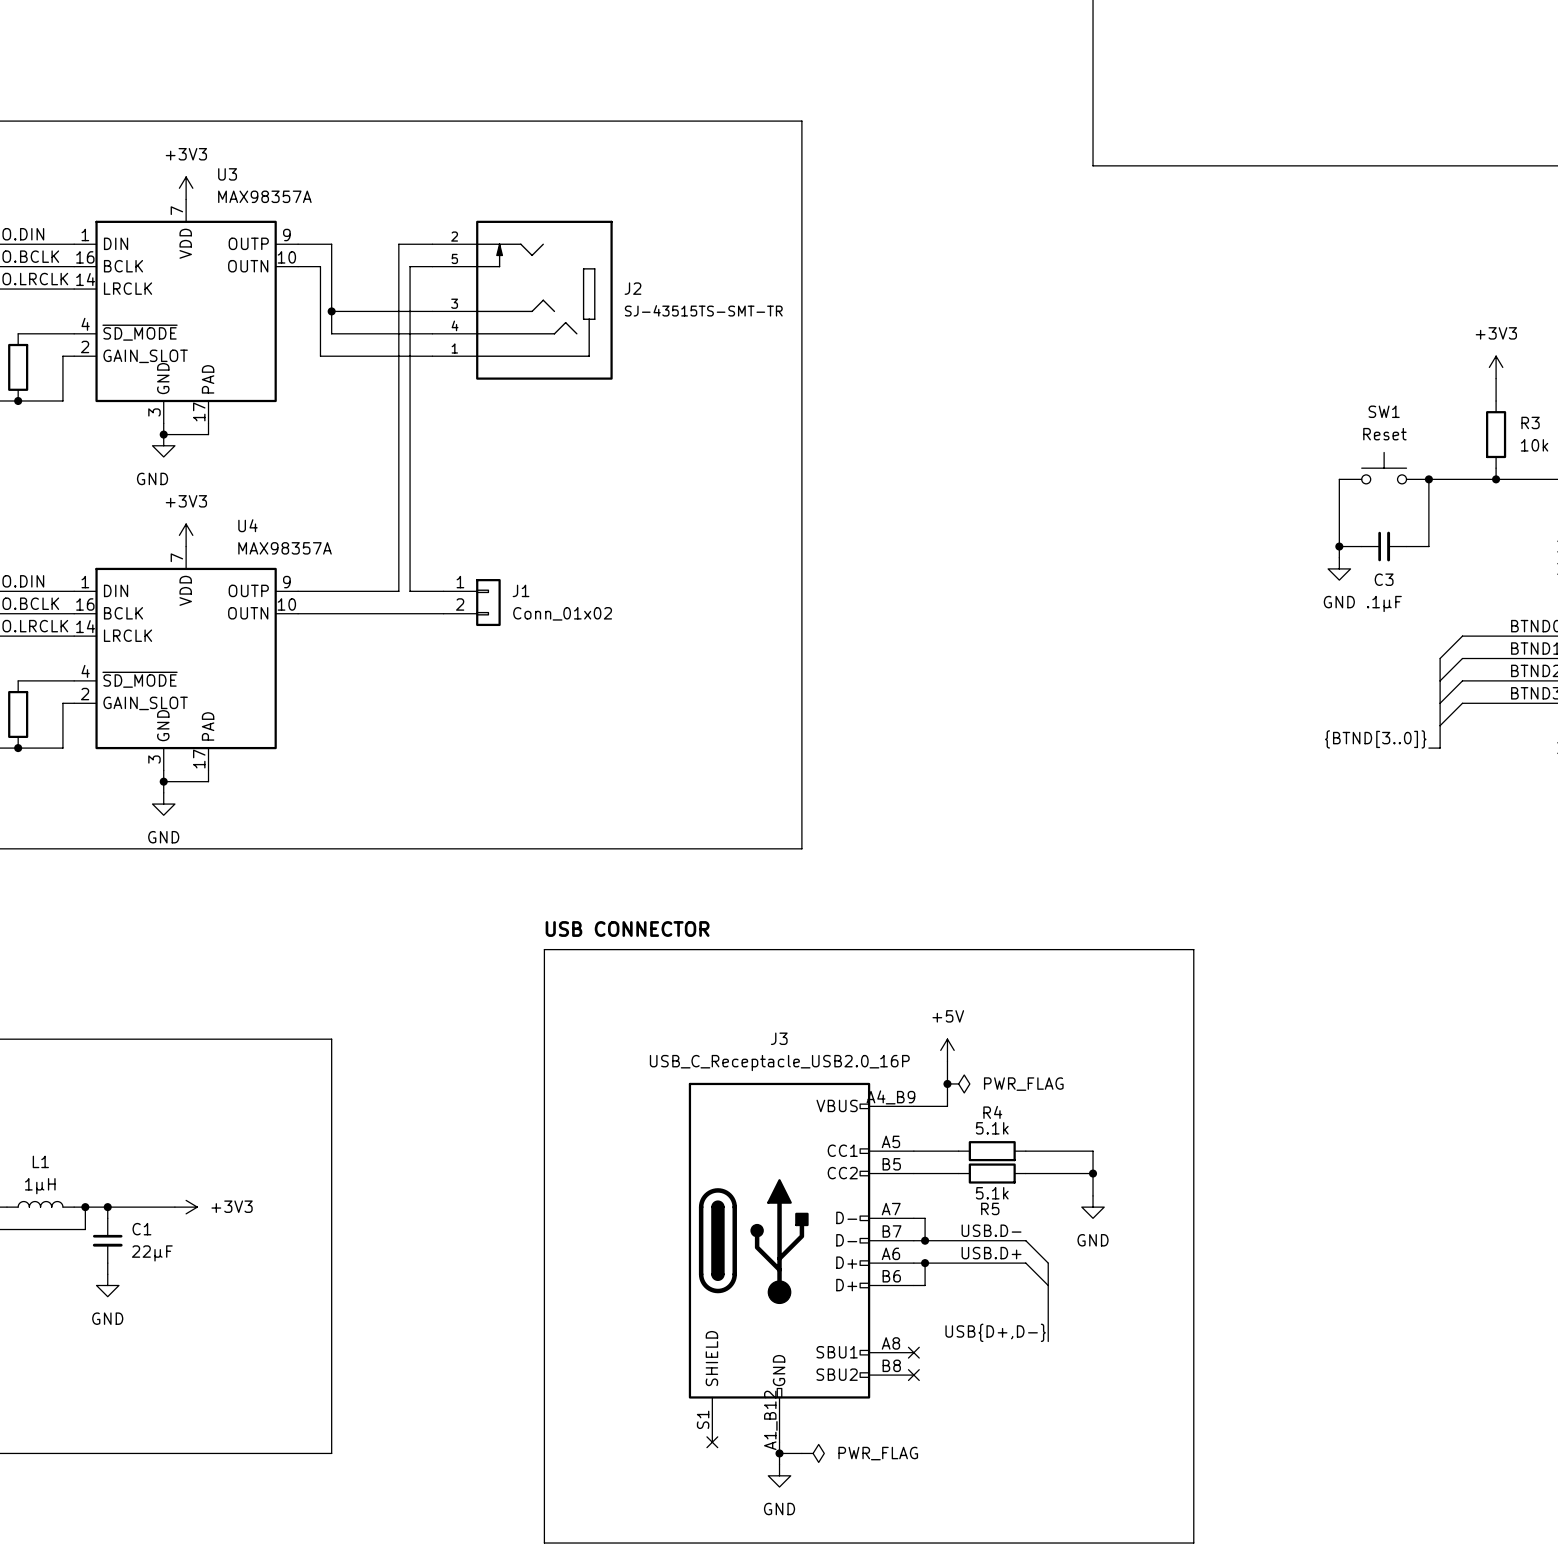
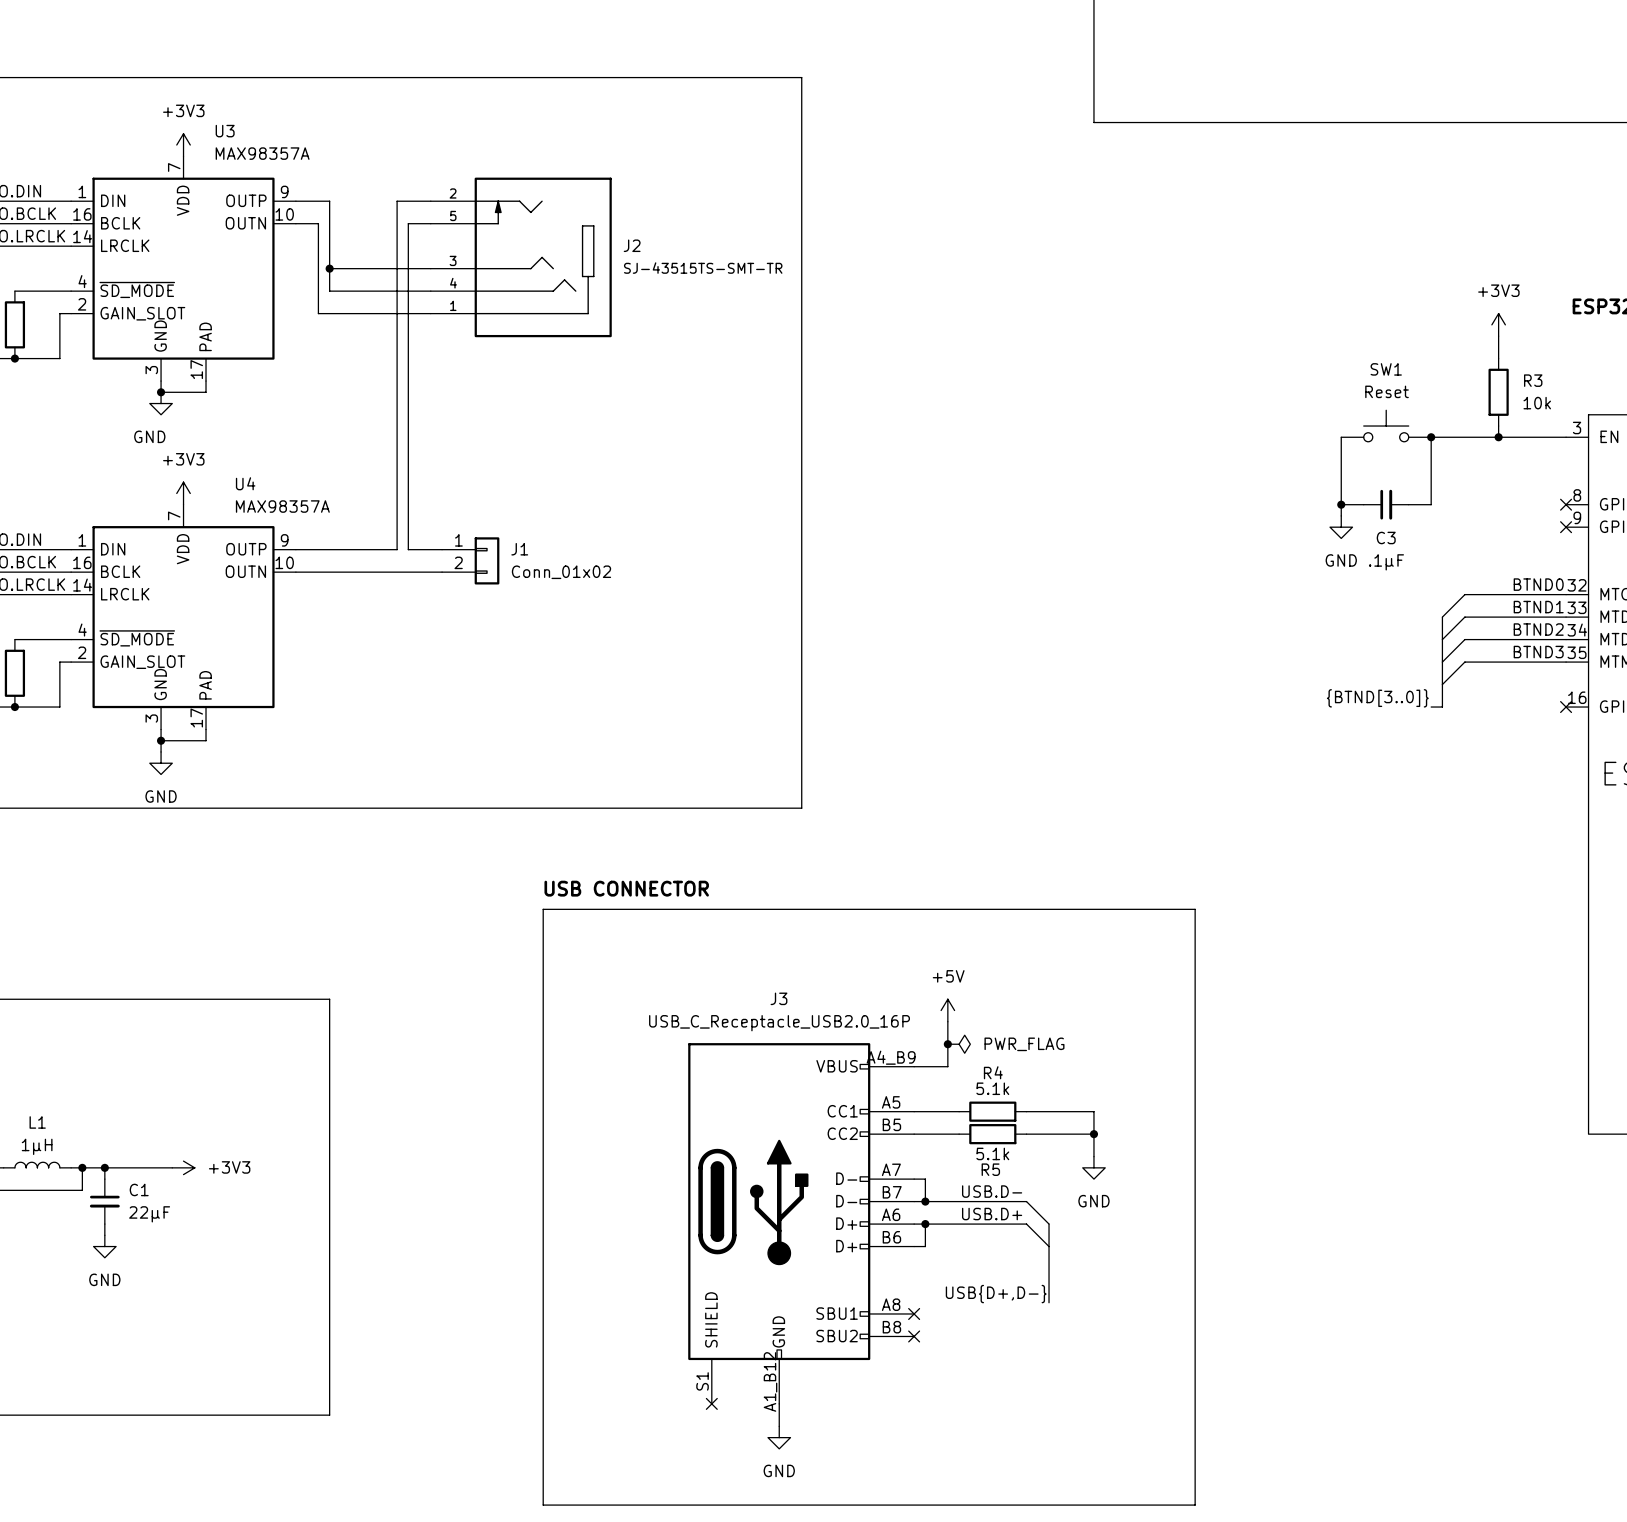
wire: (779, 1453) (801, 1453) -> none
junction: (779, 1453) -> none
power symbol: PWR_FLAG (813, 1453) -> none

